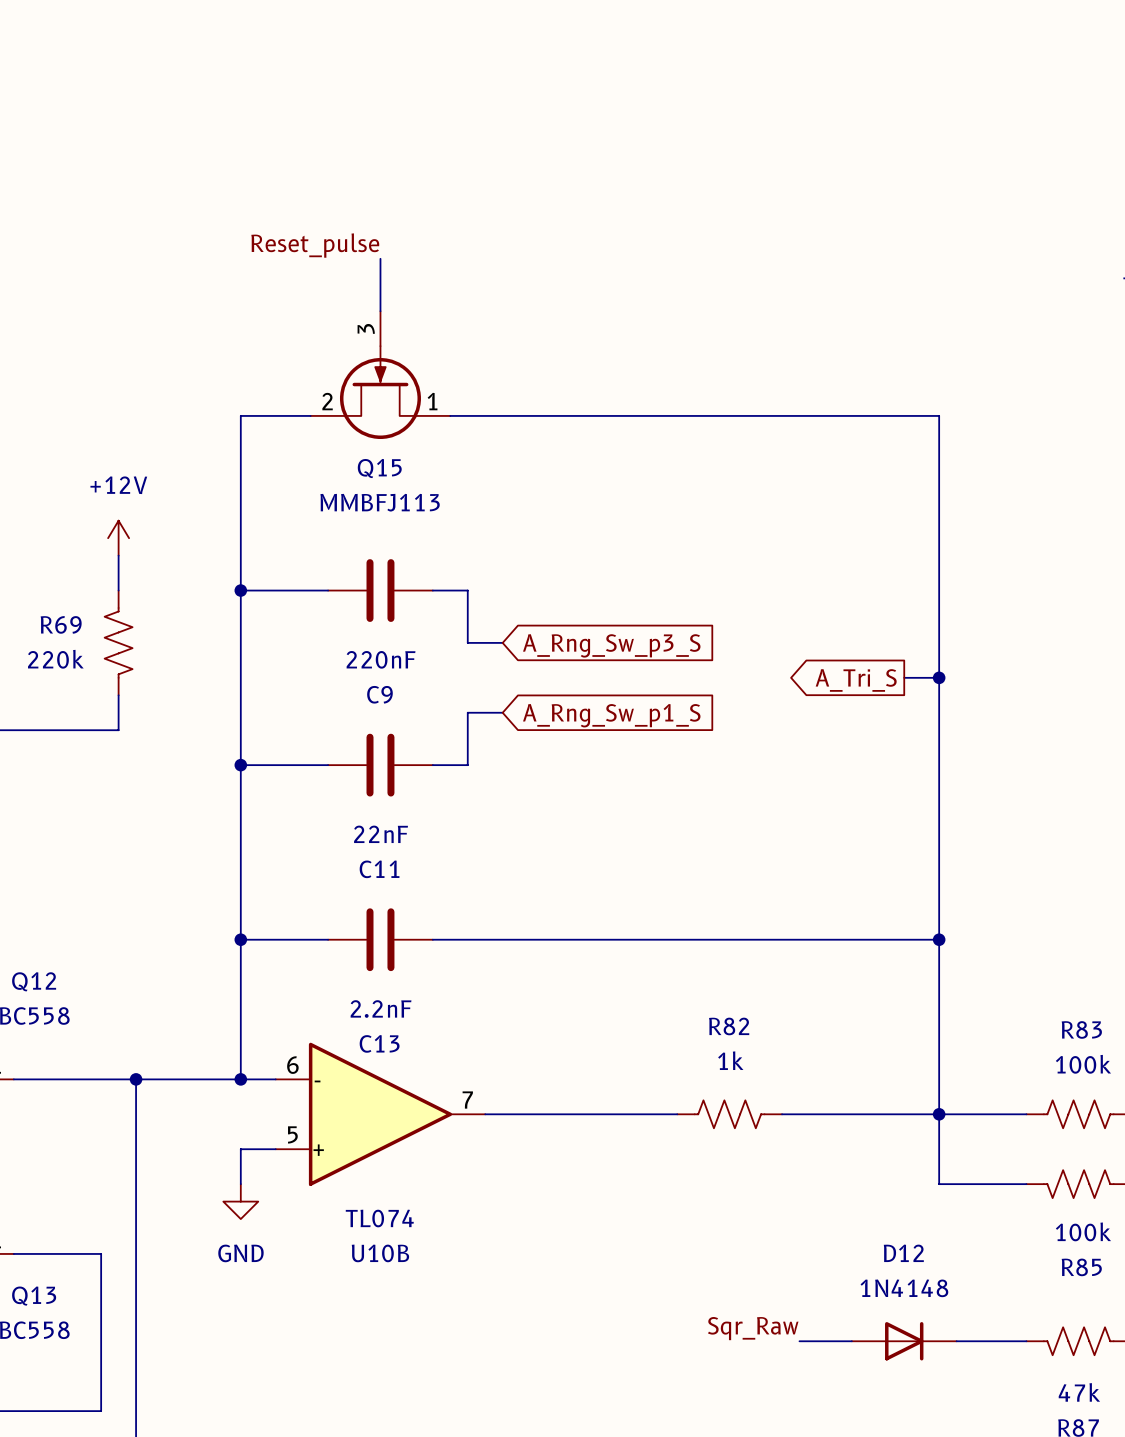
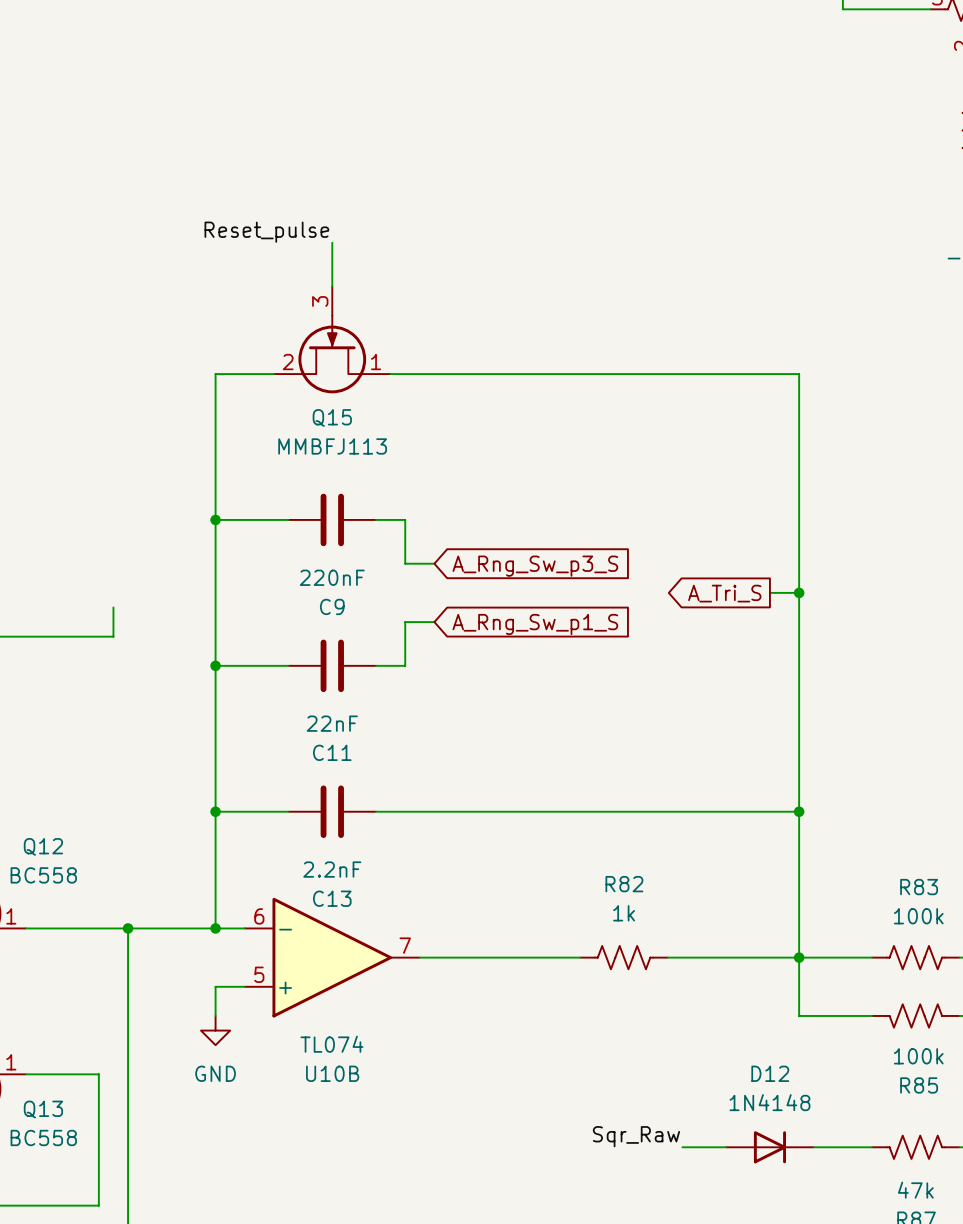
power symbol: +12V (118, 538) -> none
wire: (118, 555) (118, 590) -> none
R69: 220k (118, 642) -> none

